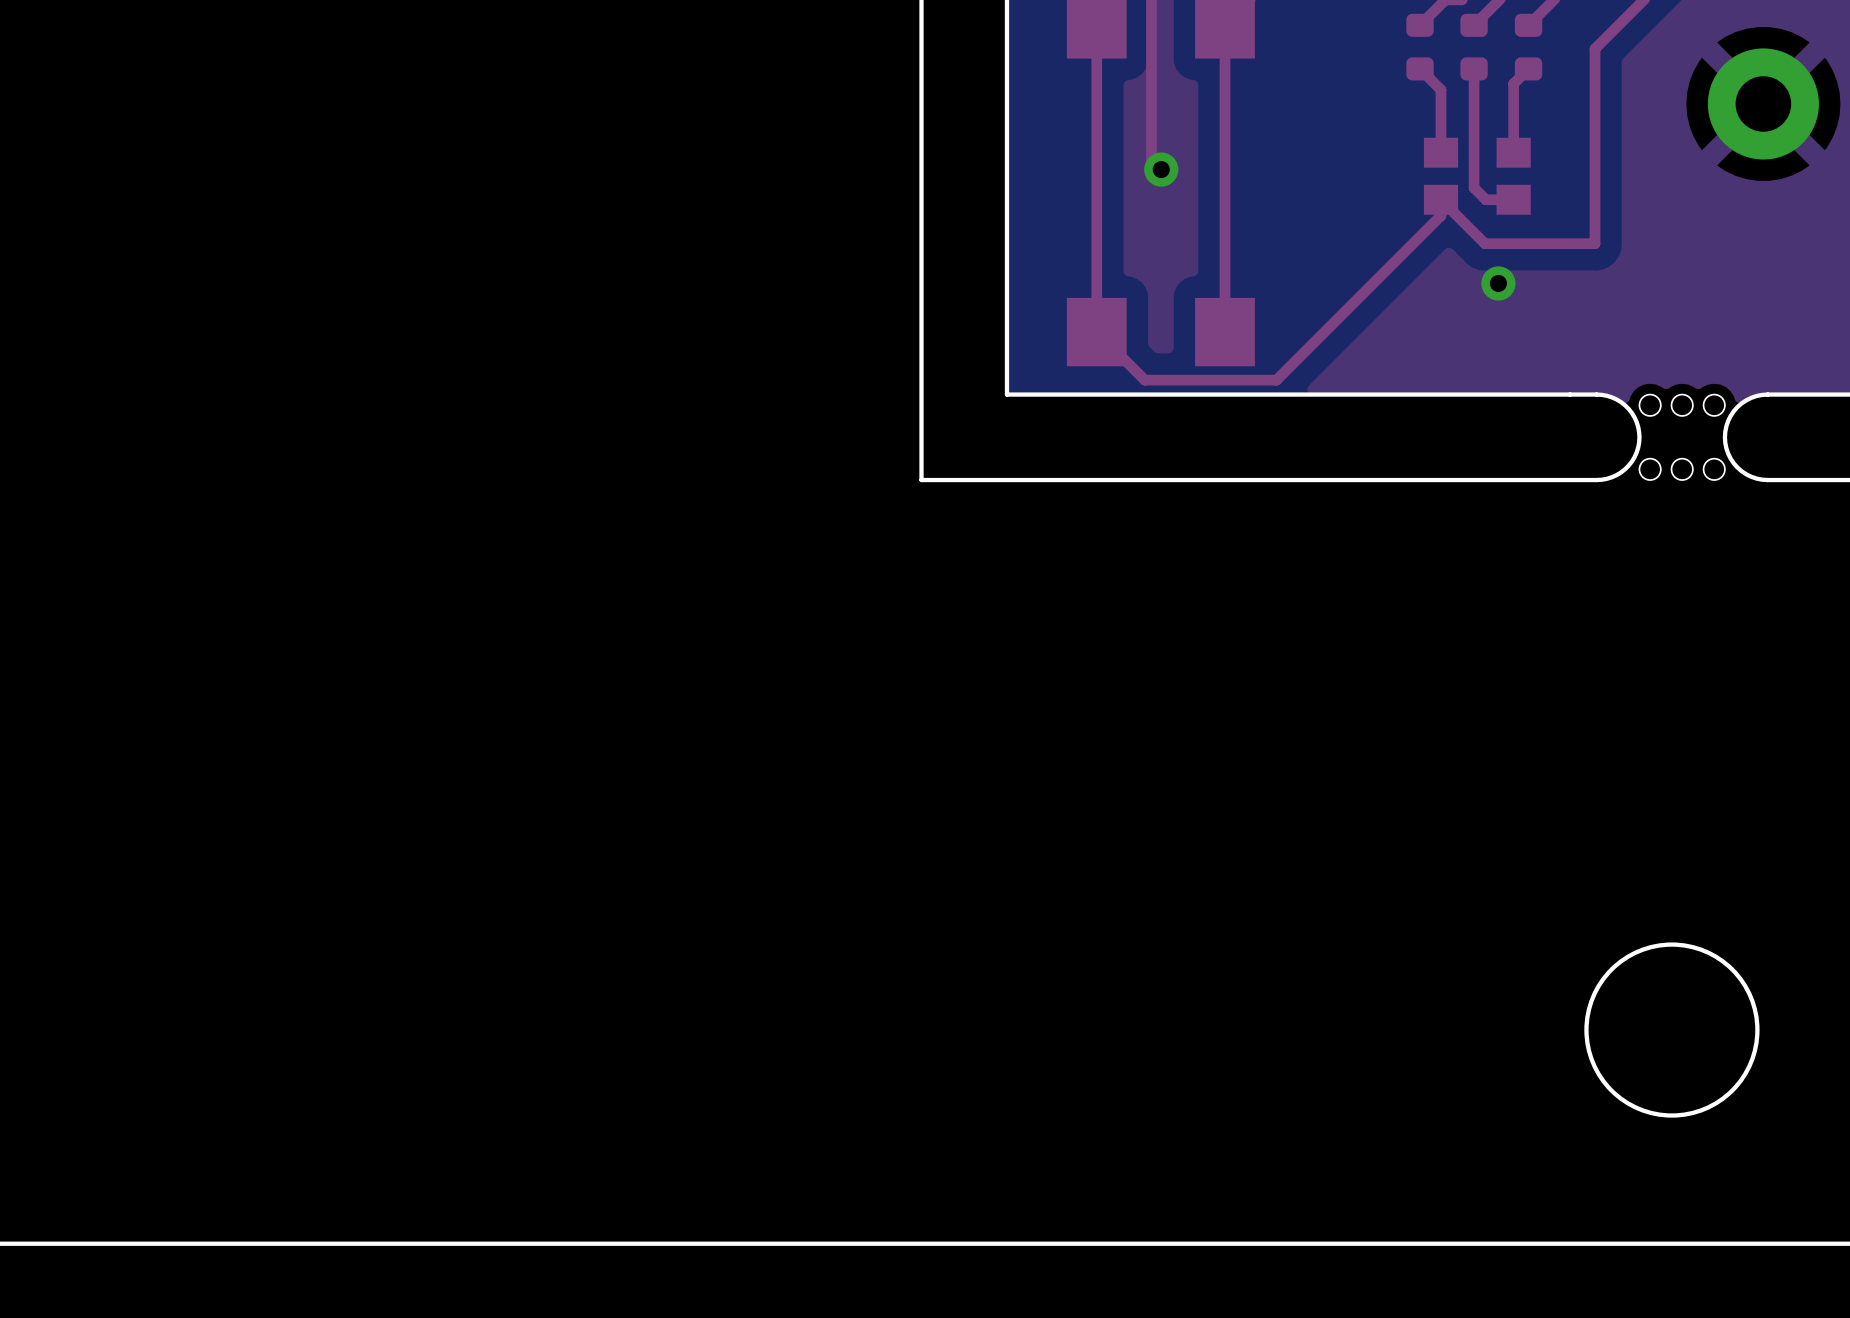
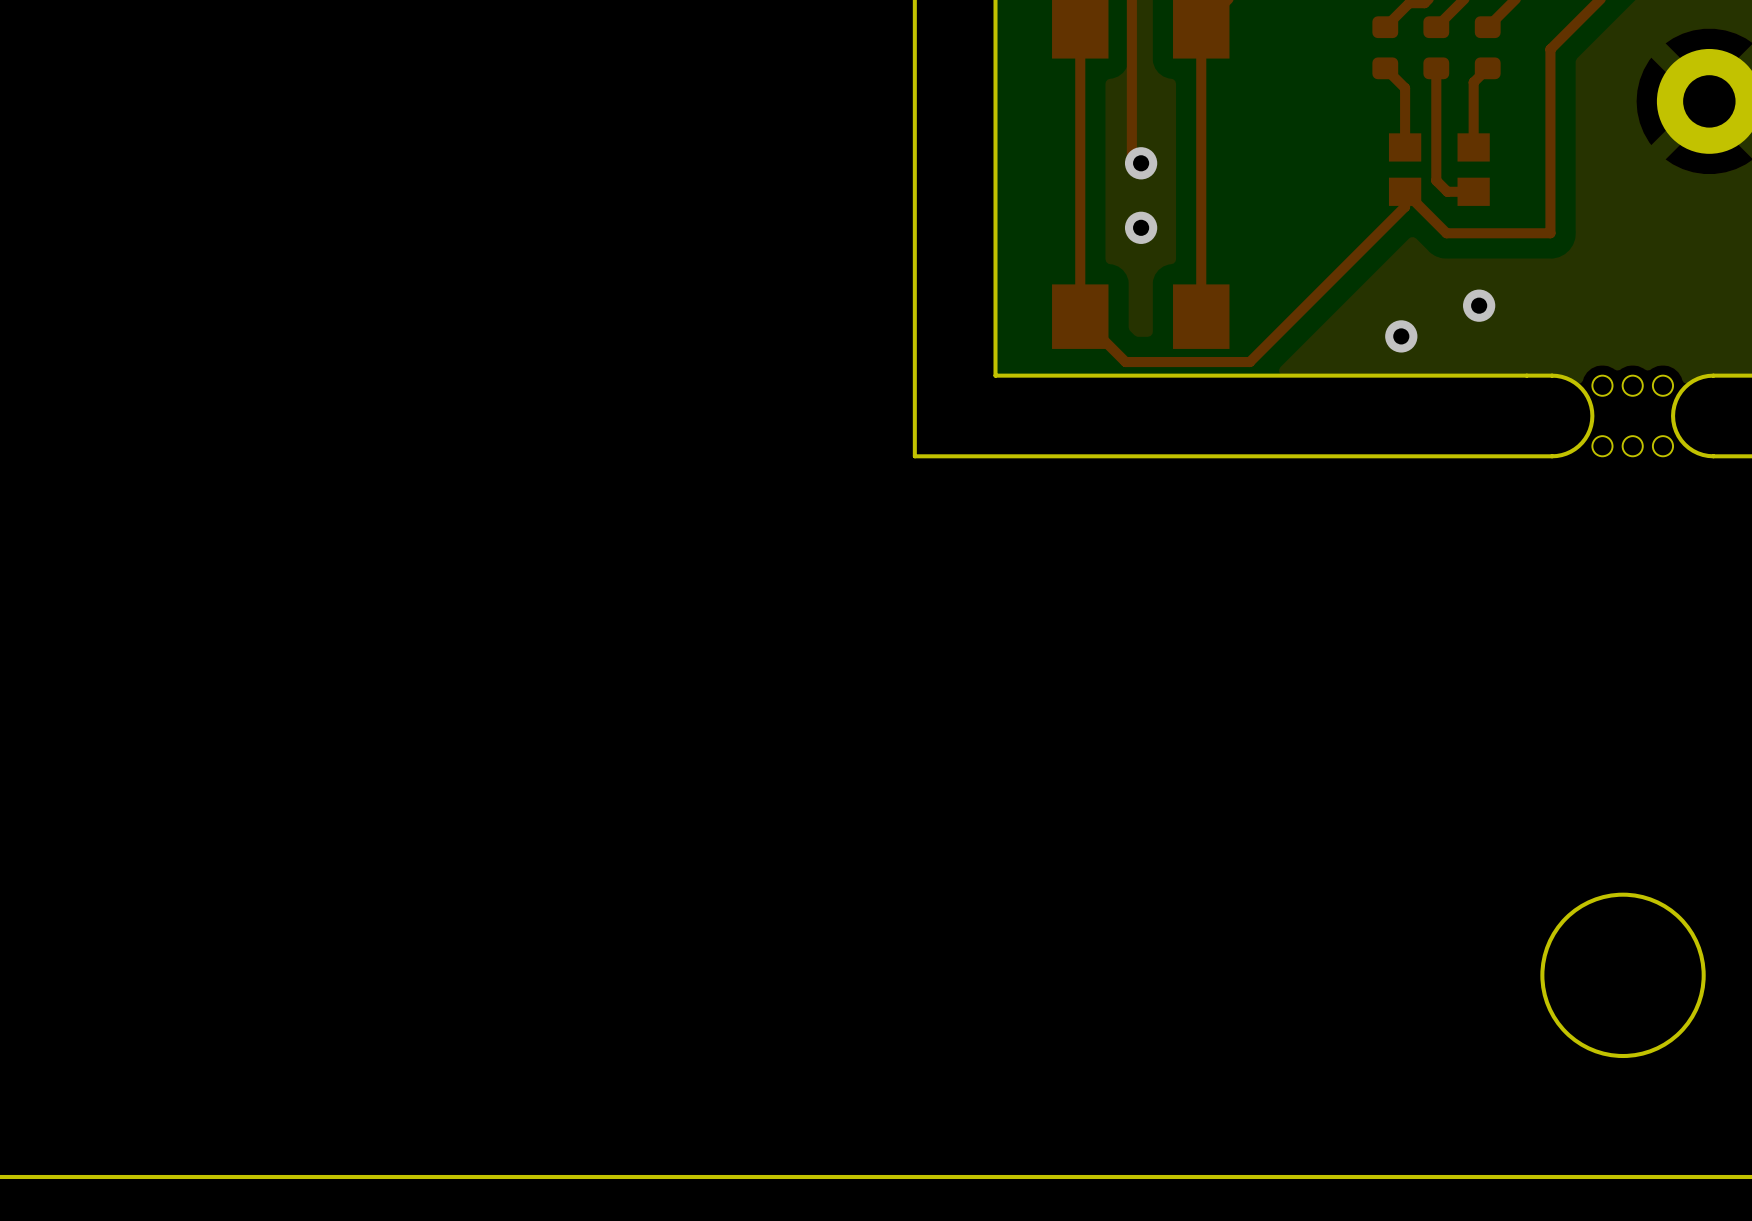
via: none -> (1141, 227)
via position: (1498, 283) -> (1479, 305)
via: none -> (1401, 336)

